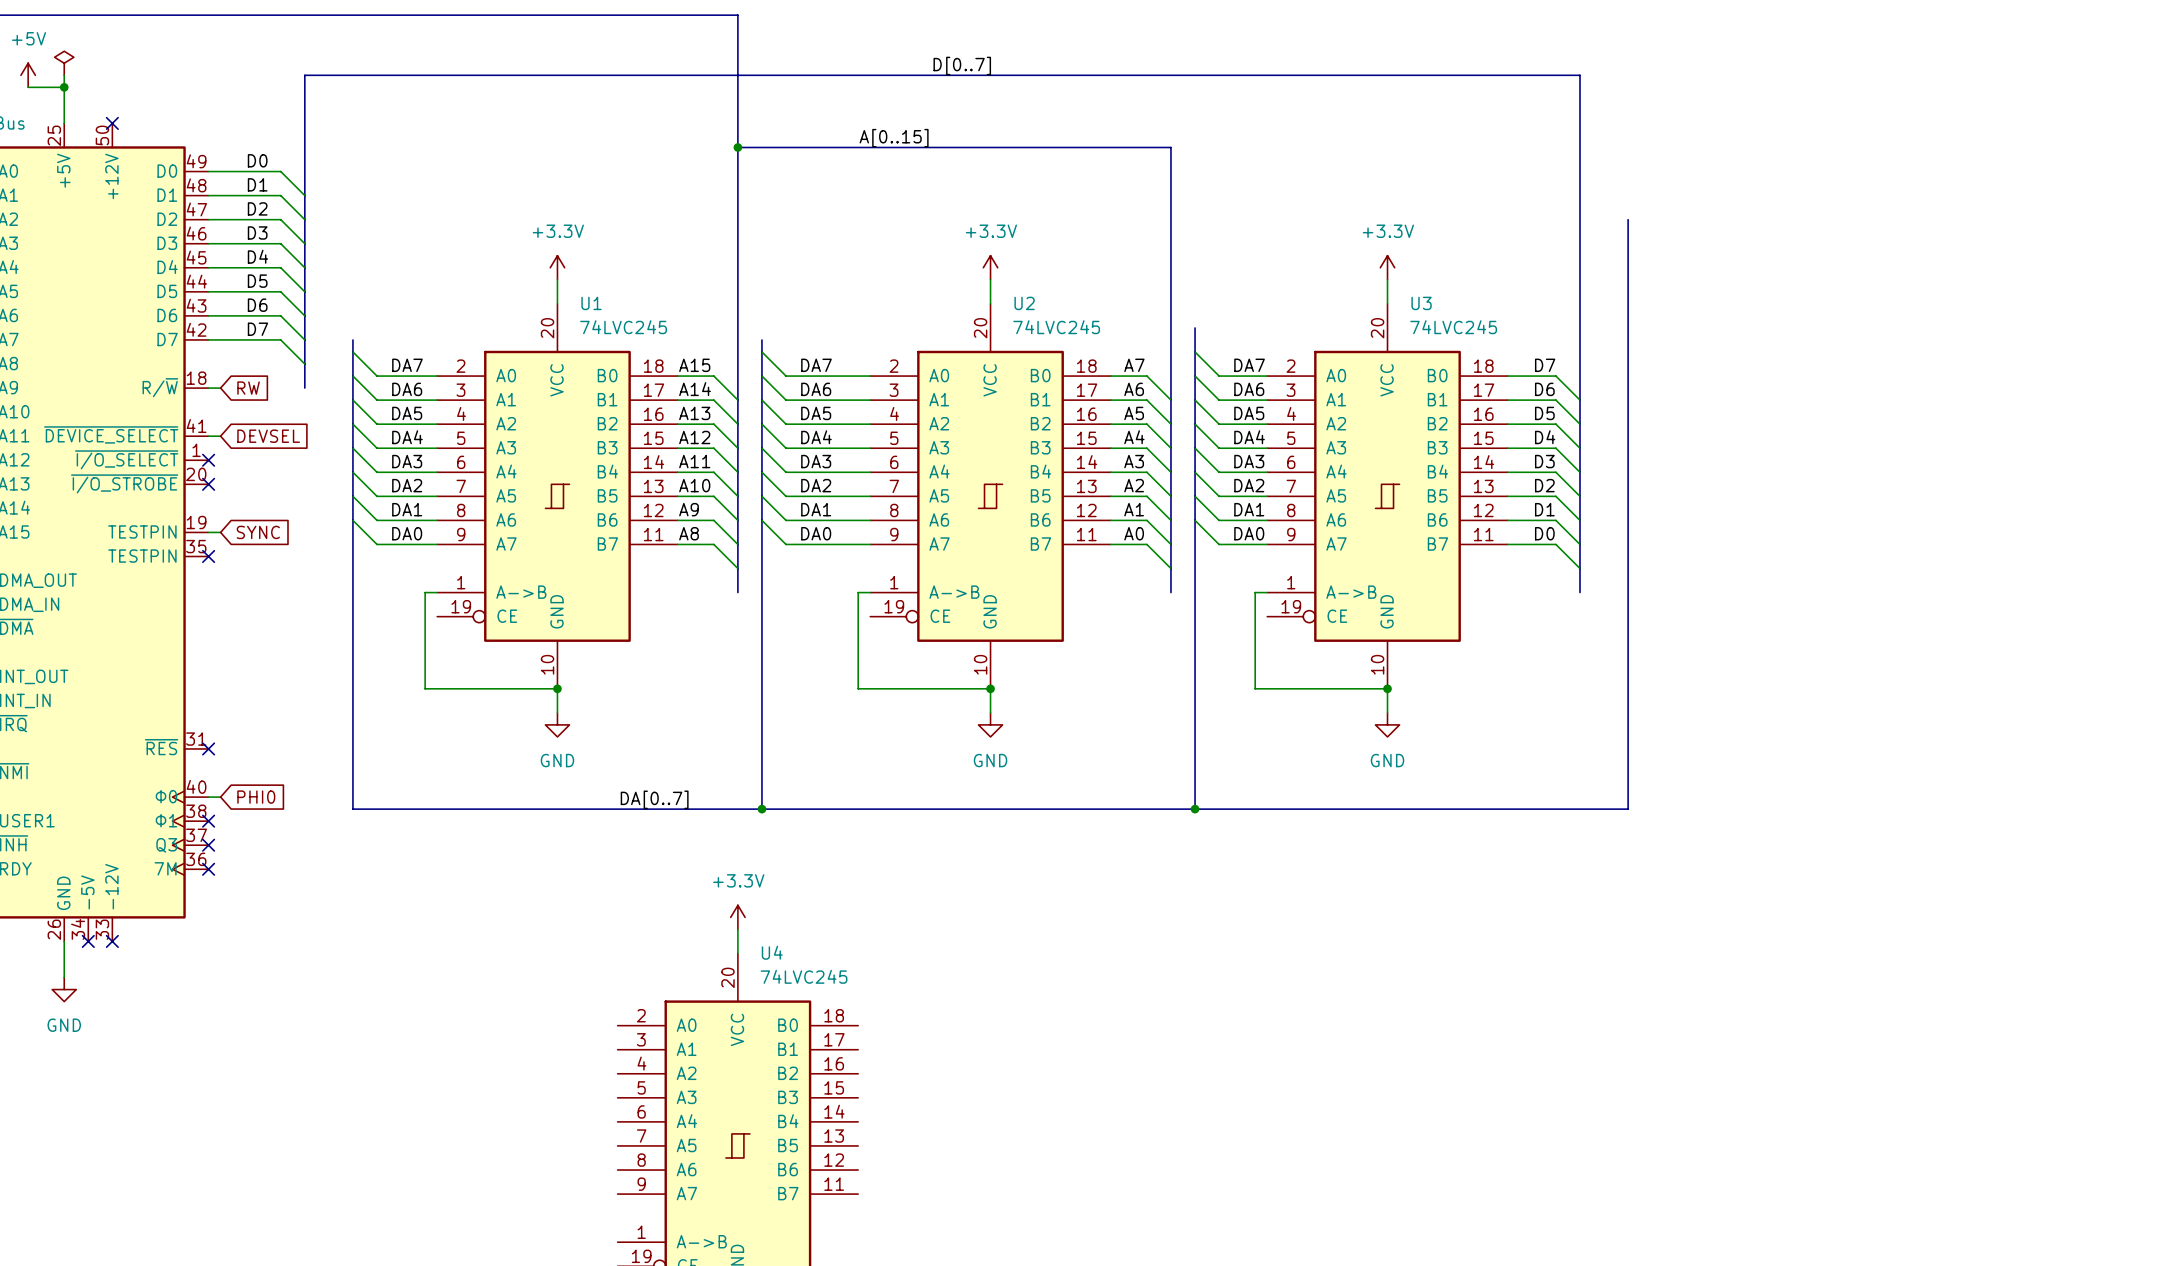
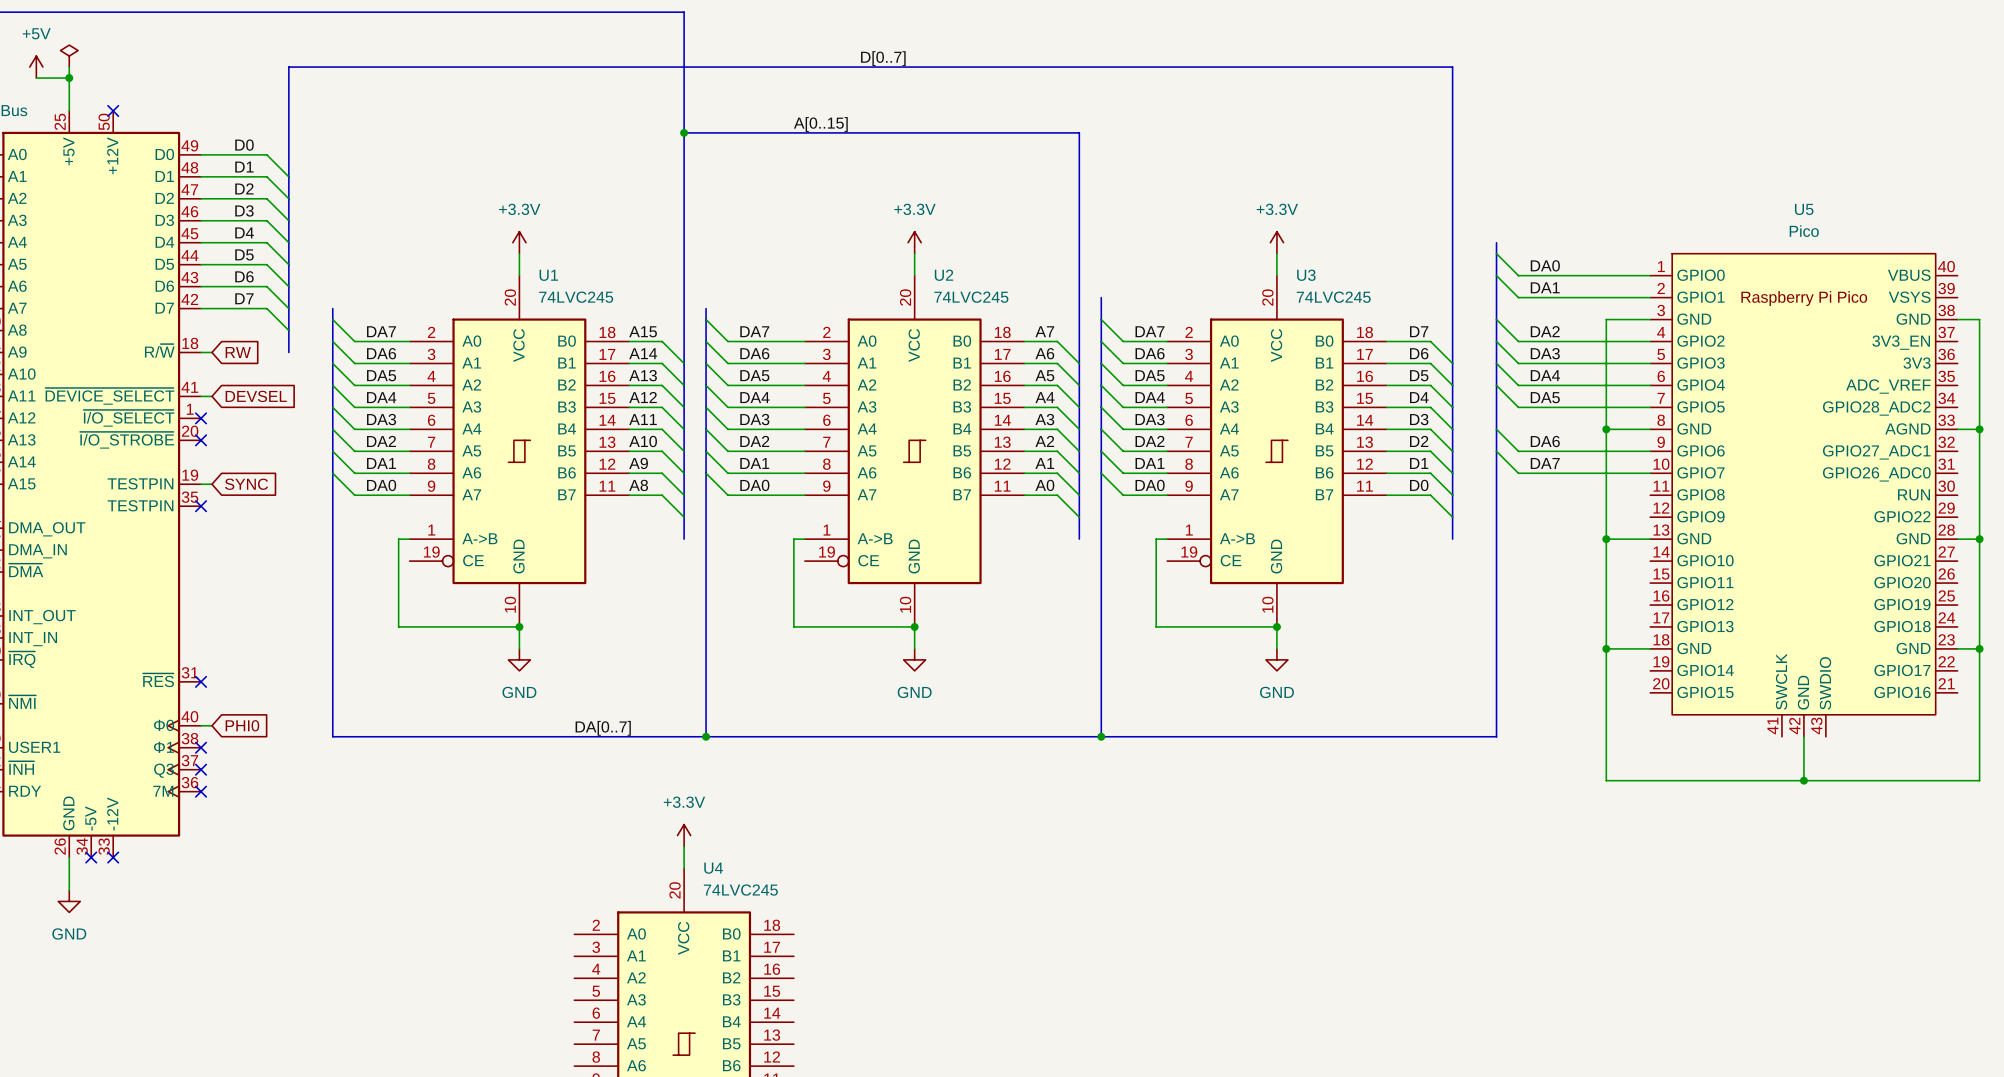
bus: (1628, 219) (1628, 267) -> none
wire: none -> (1496, 253) (1518, 275) (1650, 275)
label: none -> DA0 (1545, 265)
wire: none -> (1496, 275) (1518, 297) (1650, 297)
label: none -> DA1 (1545, 287)
wire: none -> (1496, 319) (1518, 341) (1650, 341)
wire: none -> (1650, 319) (1606, 319) (1606, 780) (1979, 780) (1979, 319) (1957, 319)
label: none -> DA2 (1545, 331)
wire: none -> (1496, 341) (1518, 363) (1650, 363)
label: none -> DA3 (1545, 353)
wire: none -> (1496, 363) (1518, 385) (1650, 385)
label: none -> DA4 (1545, 375)
wire: none -> (1496, 385) (1518, 407) (1650, 407)
label: none -> DA5 (1545, 397)
wire: none -> (1496, 429) (1518, 451) (1650, 451)
wire: none -> (1606, 429) (1650, 429)
junction: none -> (1606, 429)
wire: none -> (1957, 429) (1979, 429)
junction: none -> (1979, 429)
label: none -> DA6 (1545, 441)
wire: none -> (1496, 451) (1518, 473) (1650, 473)
label: none -> DA7 (1545, 463)
U5: none -> Pico (1803, 495)
wire: none -> (1606, 539) (1650, 539)
junction: none -> (1606, 539)
wire: none -> (1957, 539) (1979, 539)
junction: none -> (1979, 539)
wire: none -> (1606, 648) (1650, 648)
junction: none -> (1606, 648)
wire: none -> (1957, 648) (1979, 648)
junction: none -> (1979, 648)
wire: none -> (1803, 736) (1803, 780)
junction: none -> (1803, 780)

